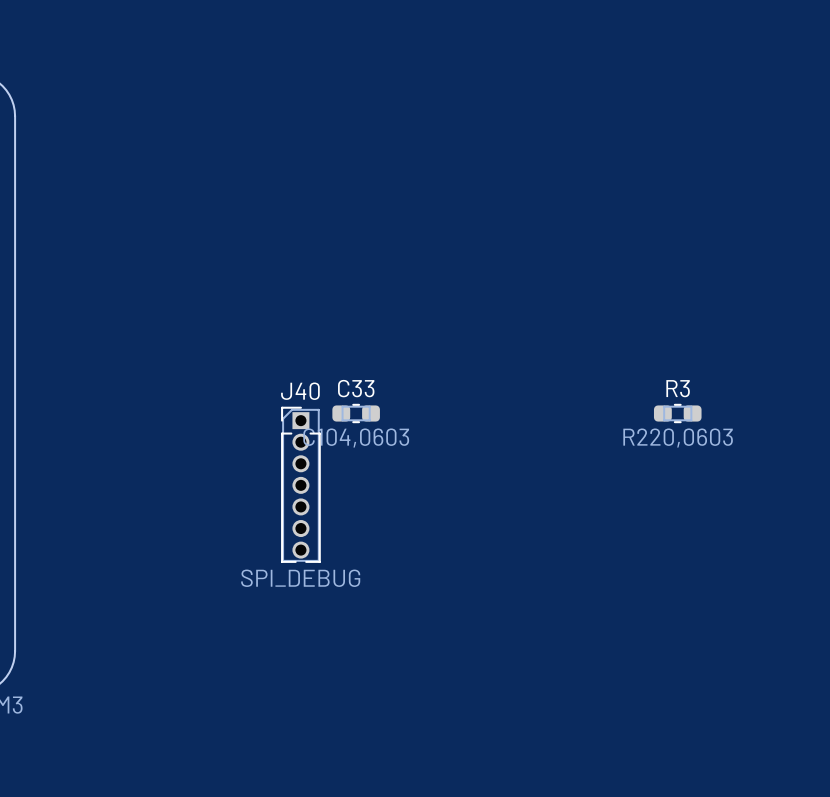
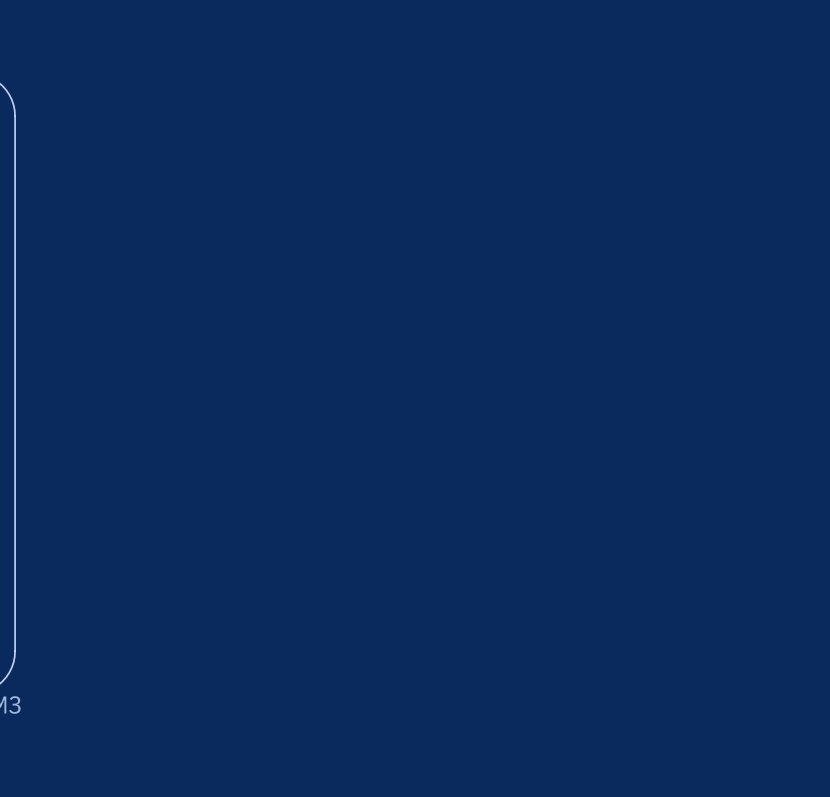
C33: C104,0603 (356, 413) -> none
R3: R220,0603 (677, 413) -> none
J40: SPI_DEBUG (300, 484) -> none

